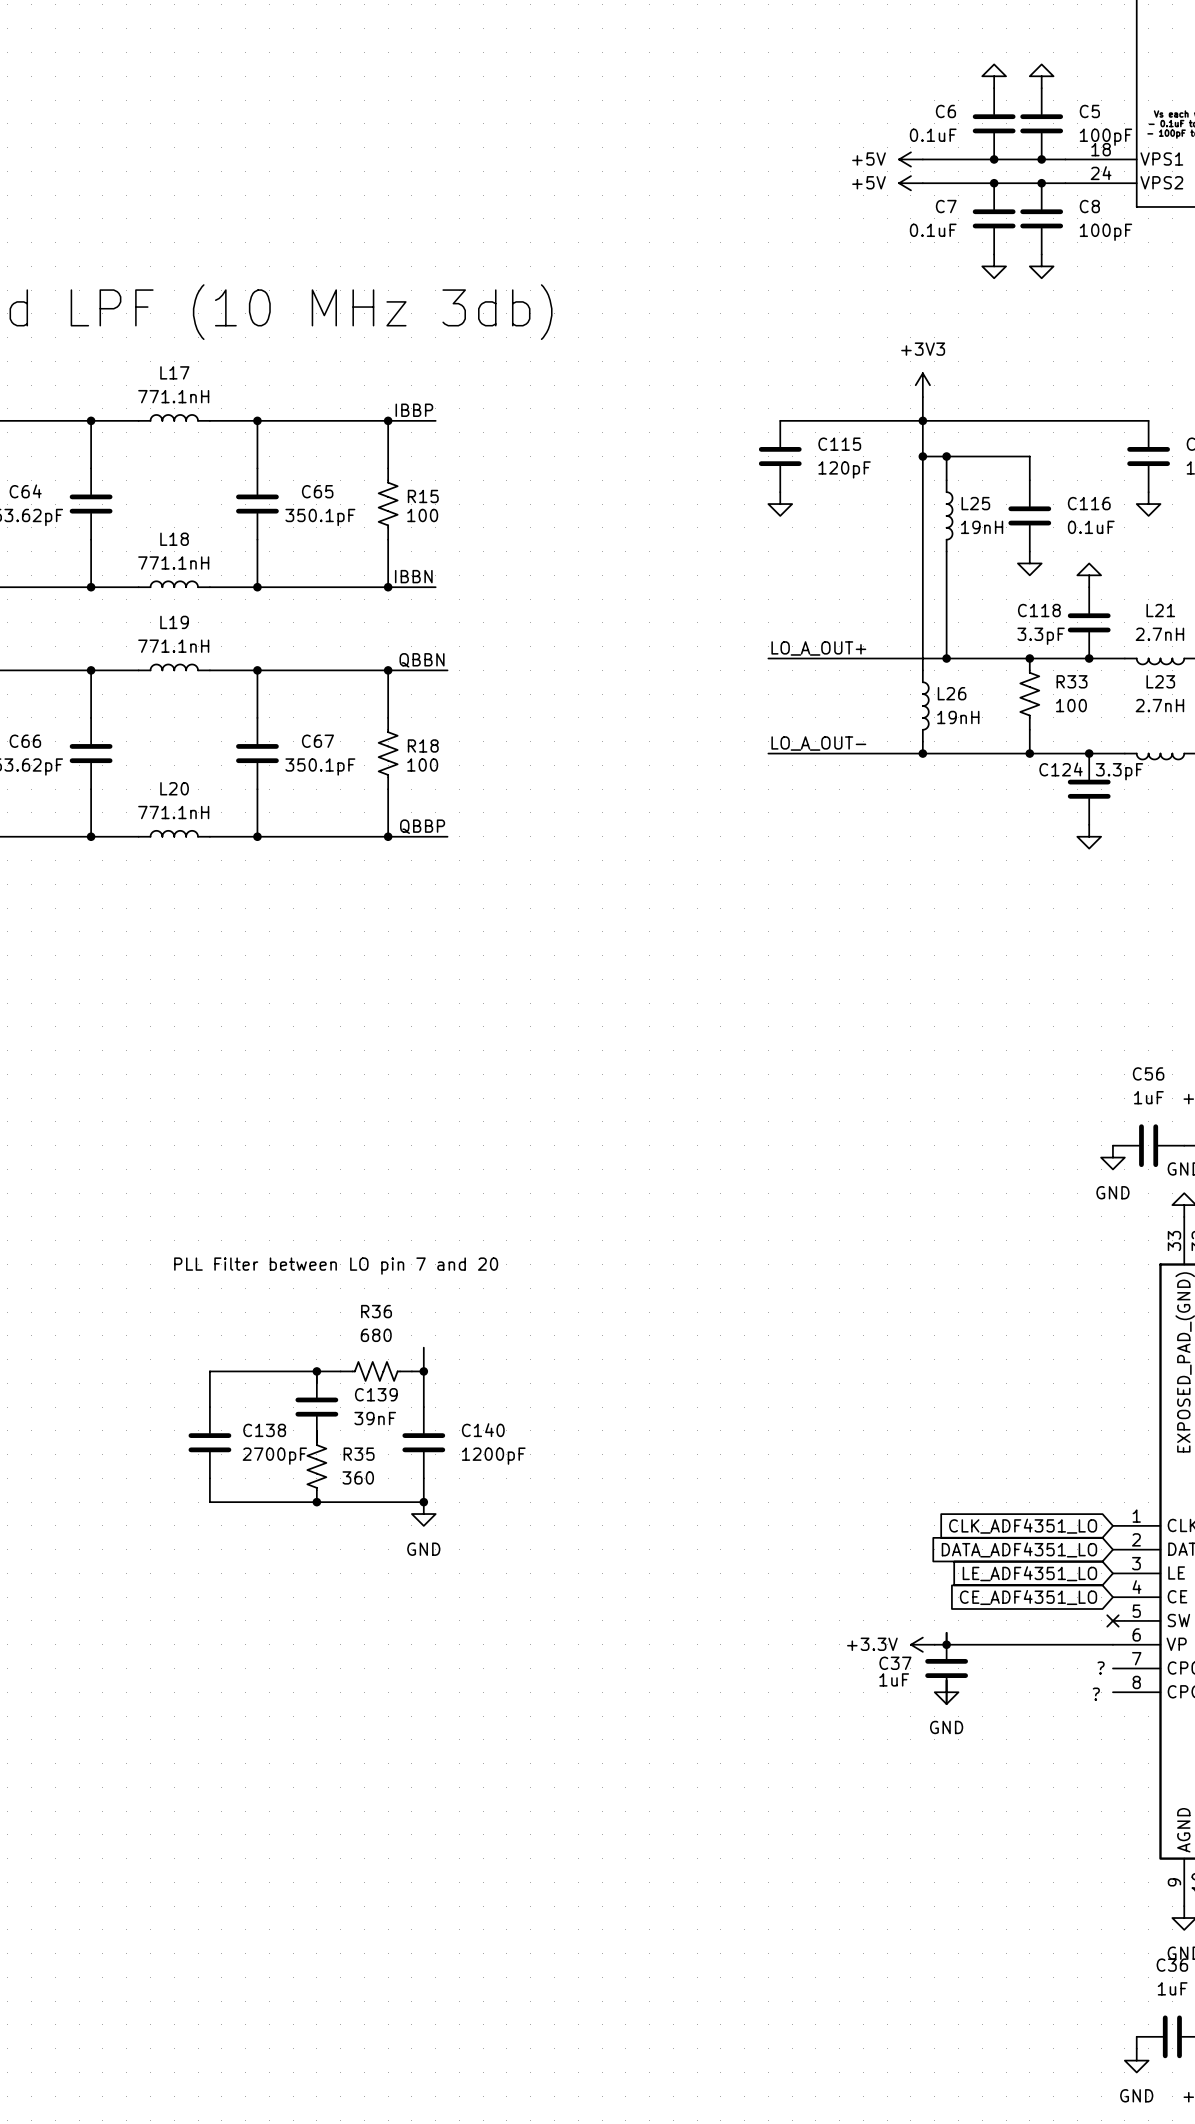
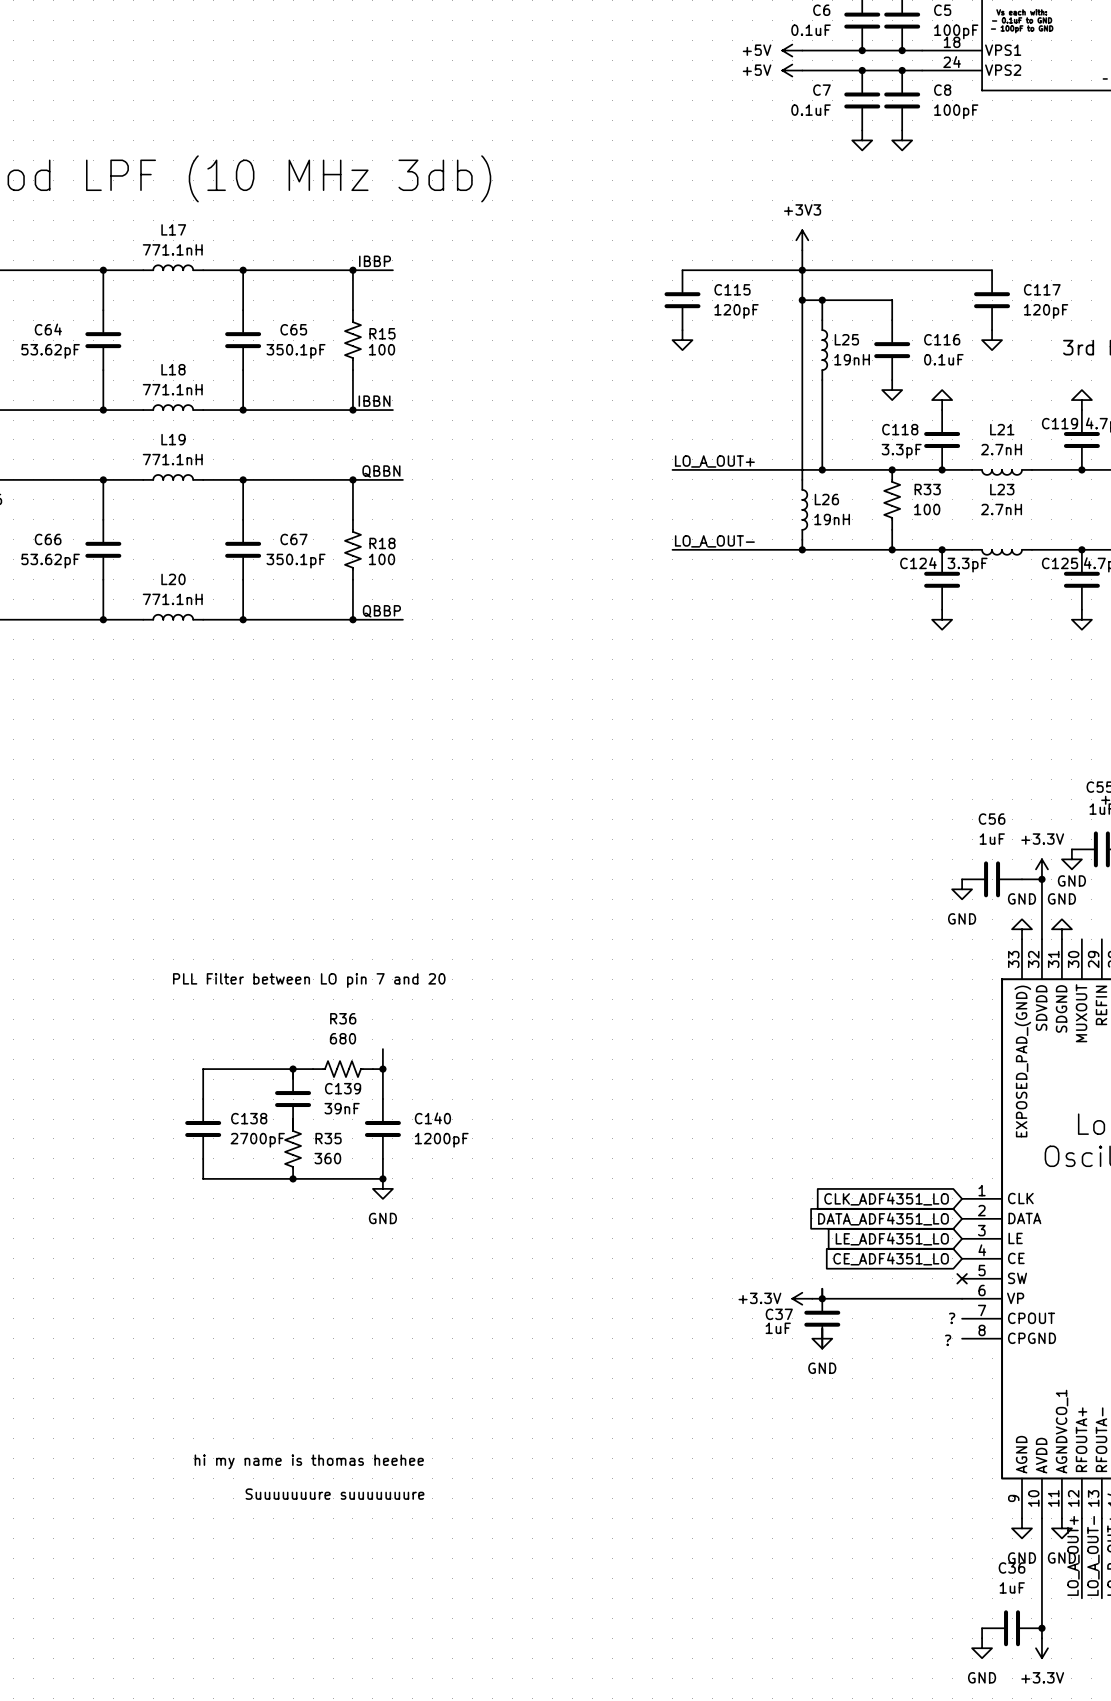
text: none -> hi my name is thomas heehee (309, 1461)
text: none -> Suuuuuuure suuuuuuure (335, 1494)

